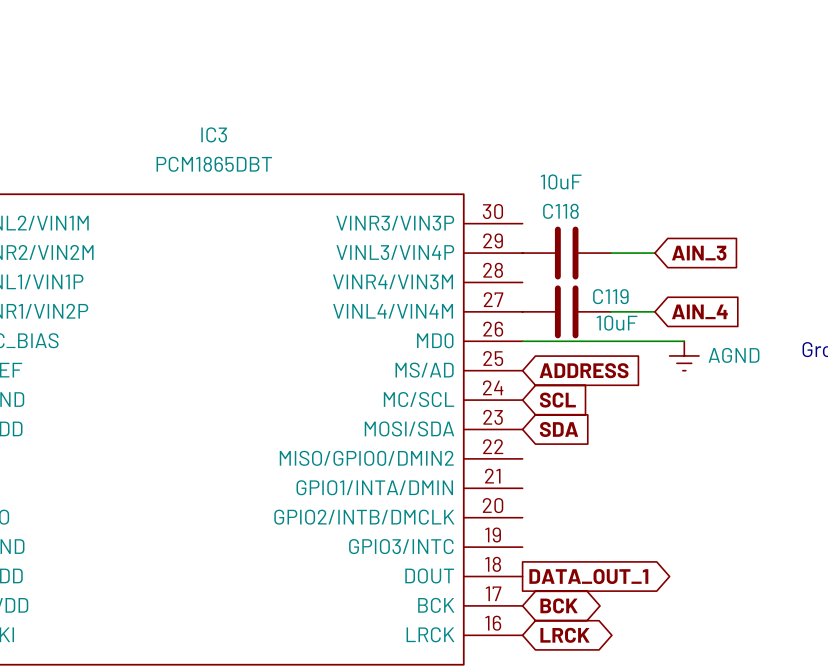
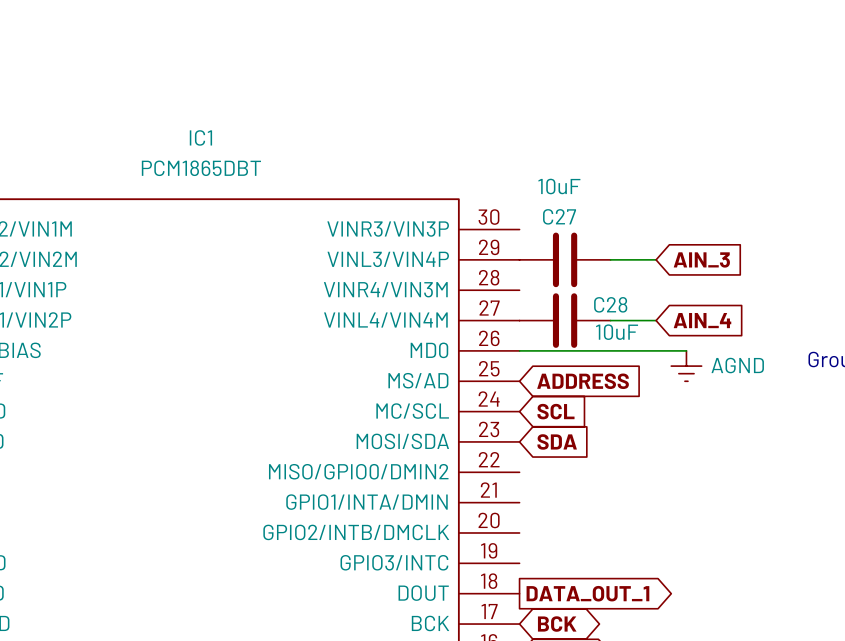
IC3 name: IC3 (214, 134) -> IC1 (200, 137)
C118 name: C118 (560, 211) -> C27 (559, 216)
C119 name: C119 (610, 296) -> C28 (610, 304)

